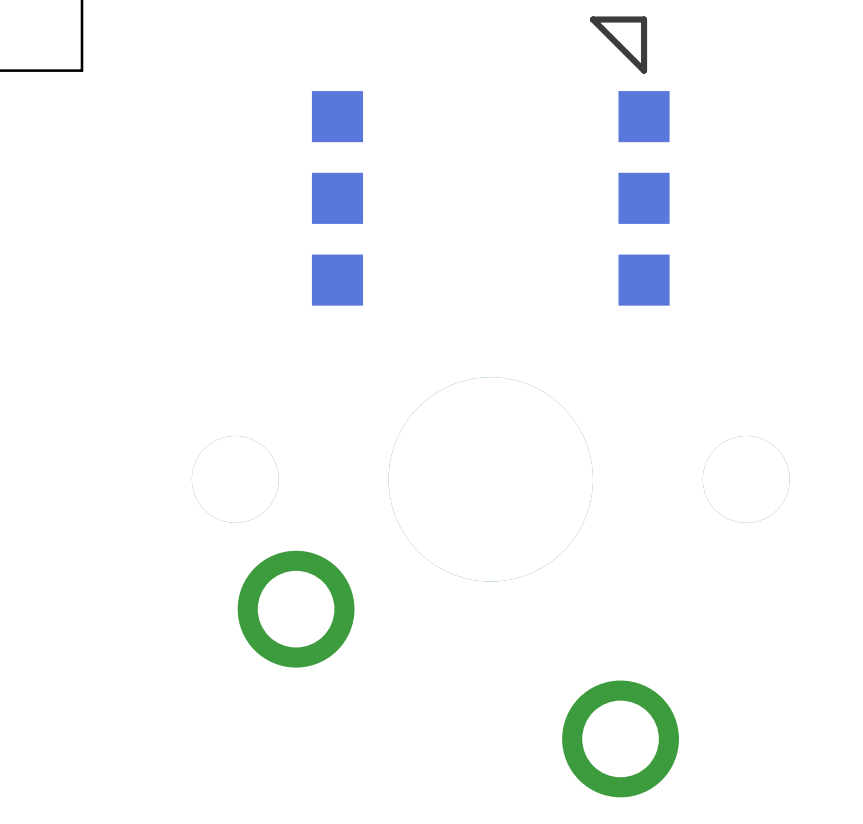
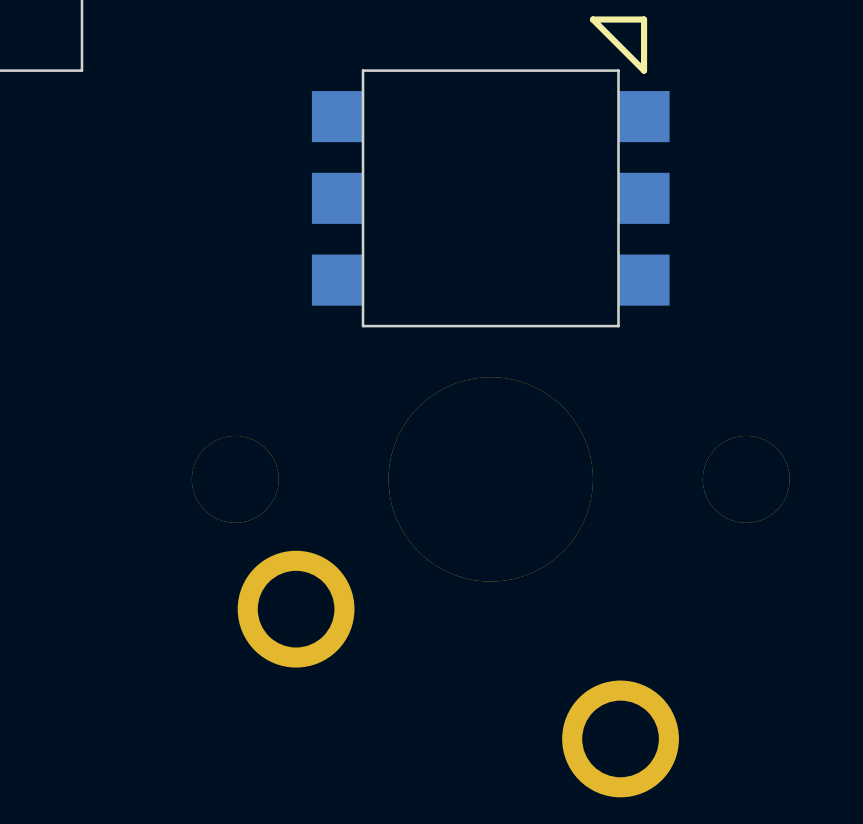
board edge: none -> (618, 70) (363, 70) (363, 326) (618, 326) (618, 70)

